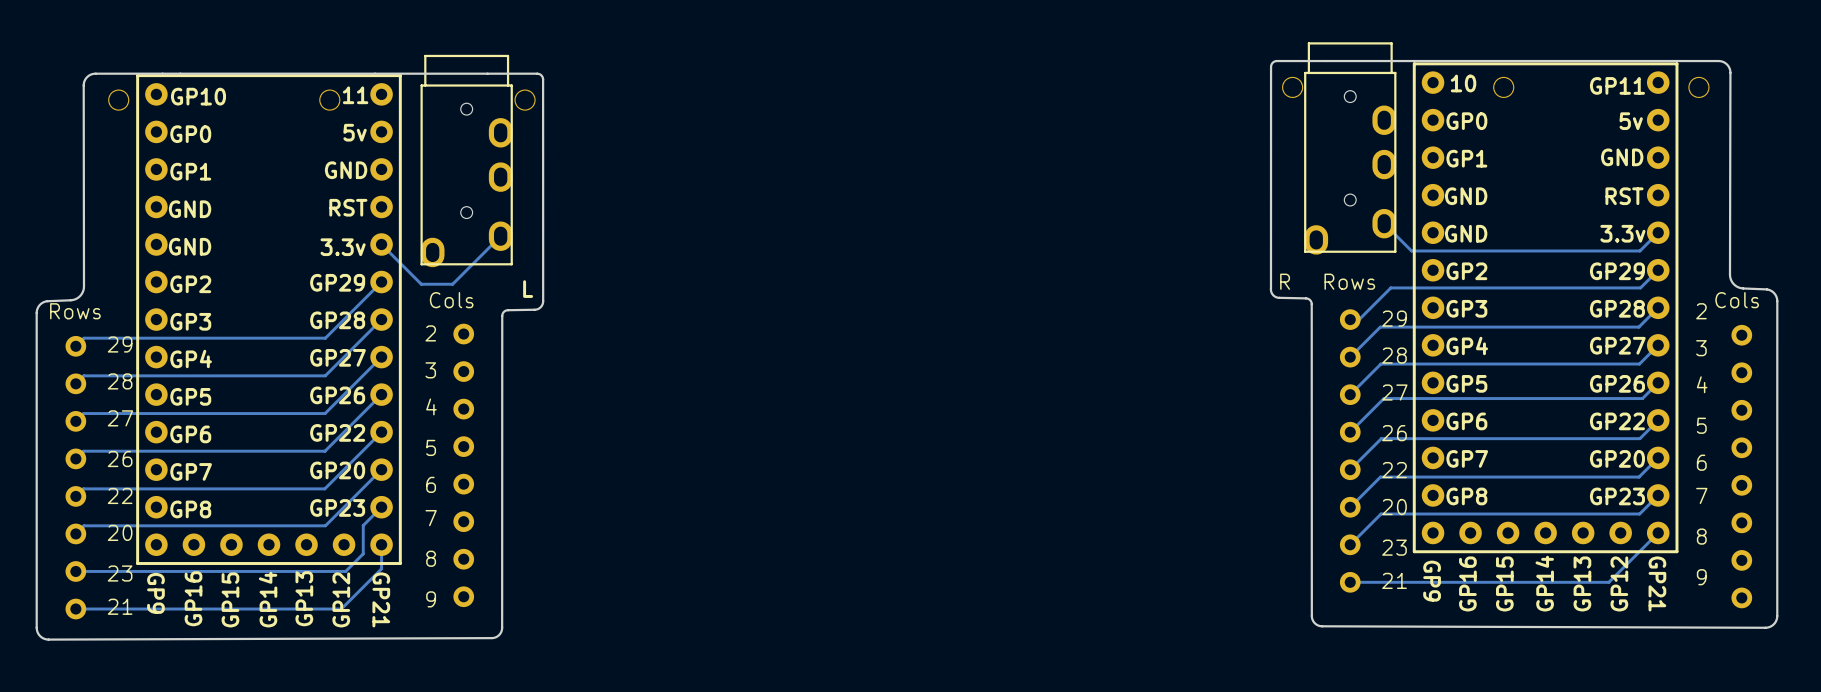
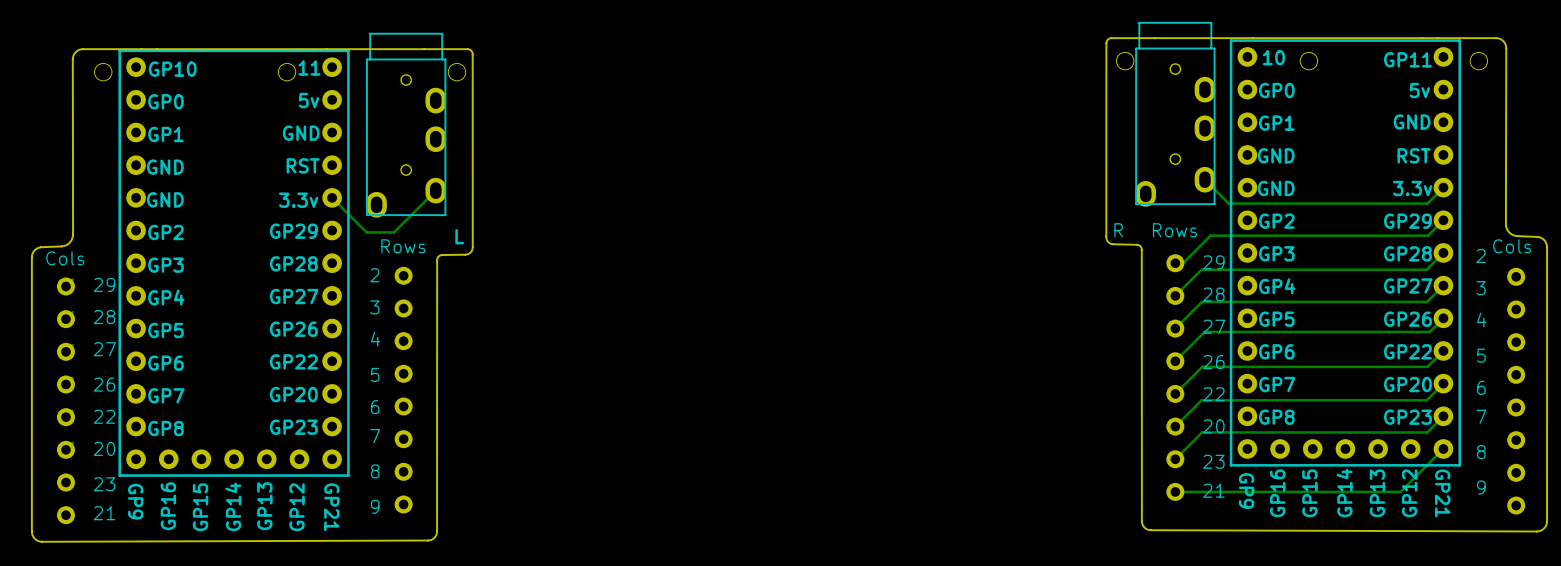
track: (381, 282) (325, 338) (84, 338) -> none
text: Cols (451, 300) -> Rows (403, 246)
text: Rows (75, 311) -> Cols (65, 258)
track: (381, 319) (325, 375) (83, 375) -> none
track: (381, 357) (325, 413) (83, 413) -> none
track: (381, 394) (324, 451) (83, 451) -> none
track: (381, 432) (324, 488) (83, 488) -> none
track: (381, 469) (325, 525) (84, 525) -> none
track: (381, 507) (363, 525) (363, 553) (345, 571) (75, 571) -> none
track: (381, 544) (381, 568) (341, 609) (75, 609) -> none

